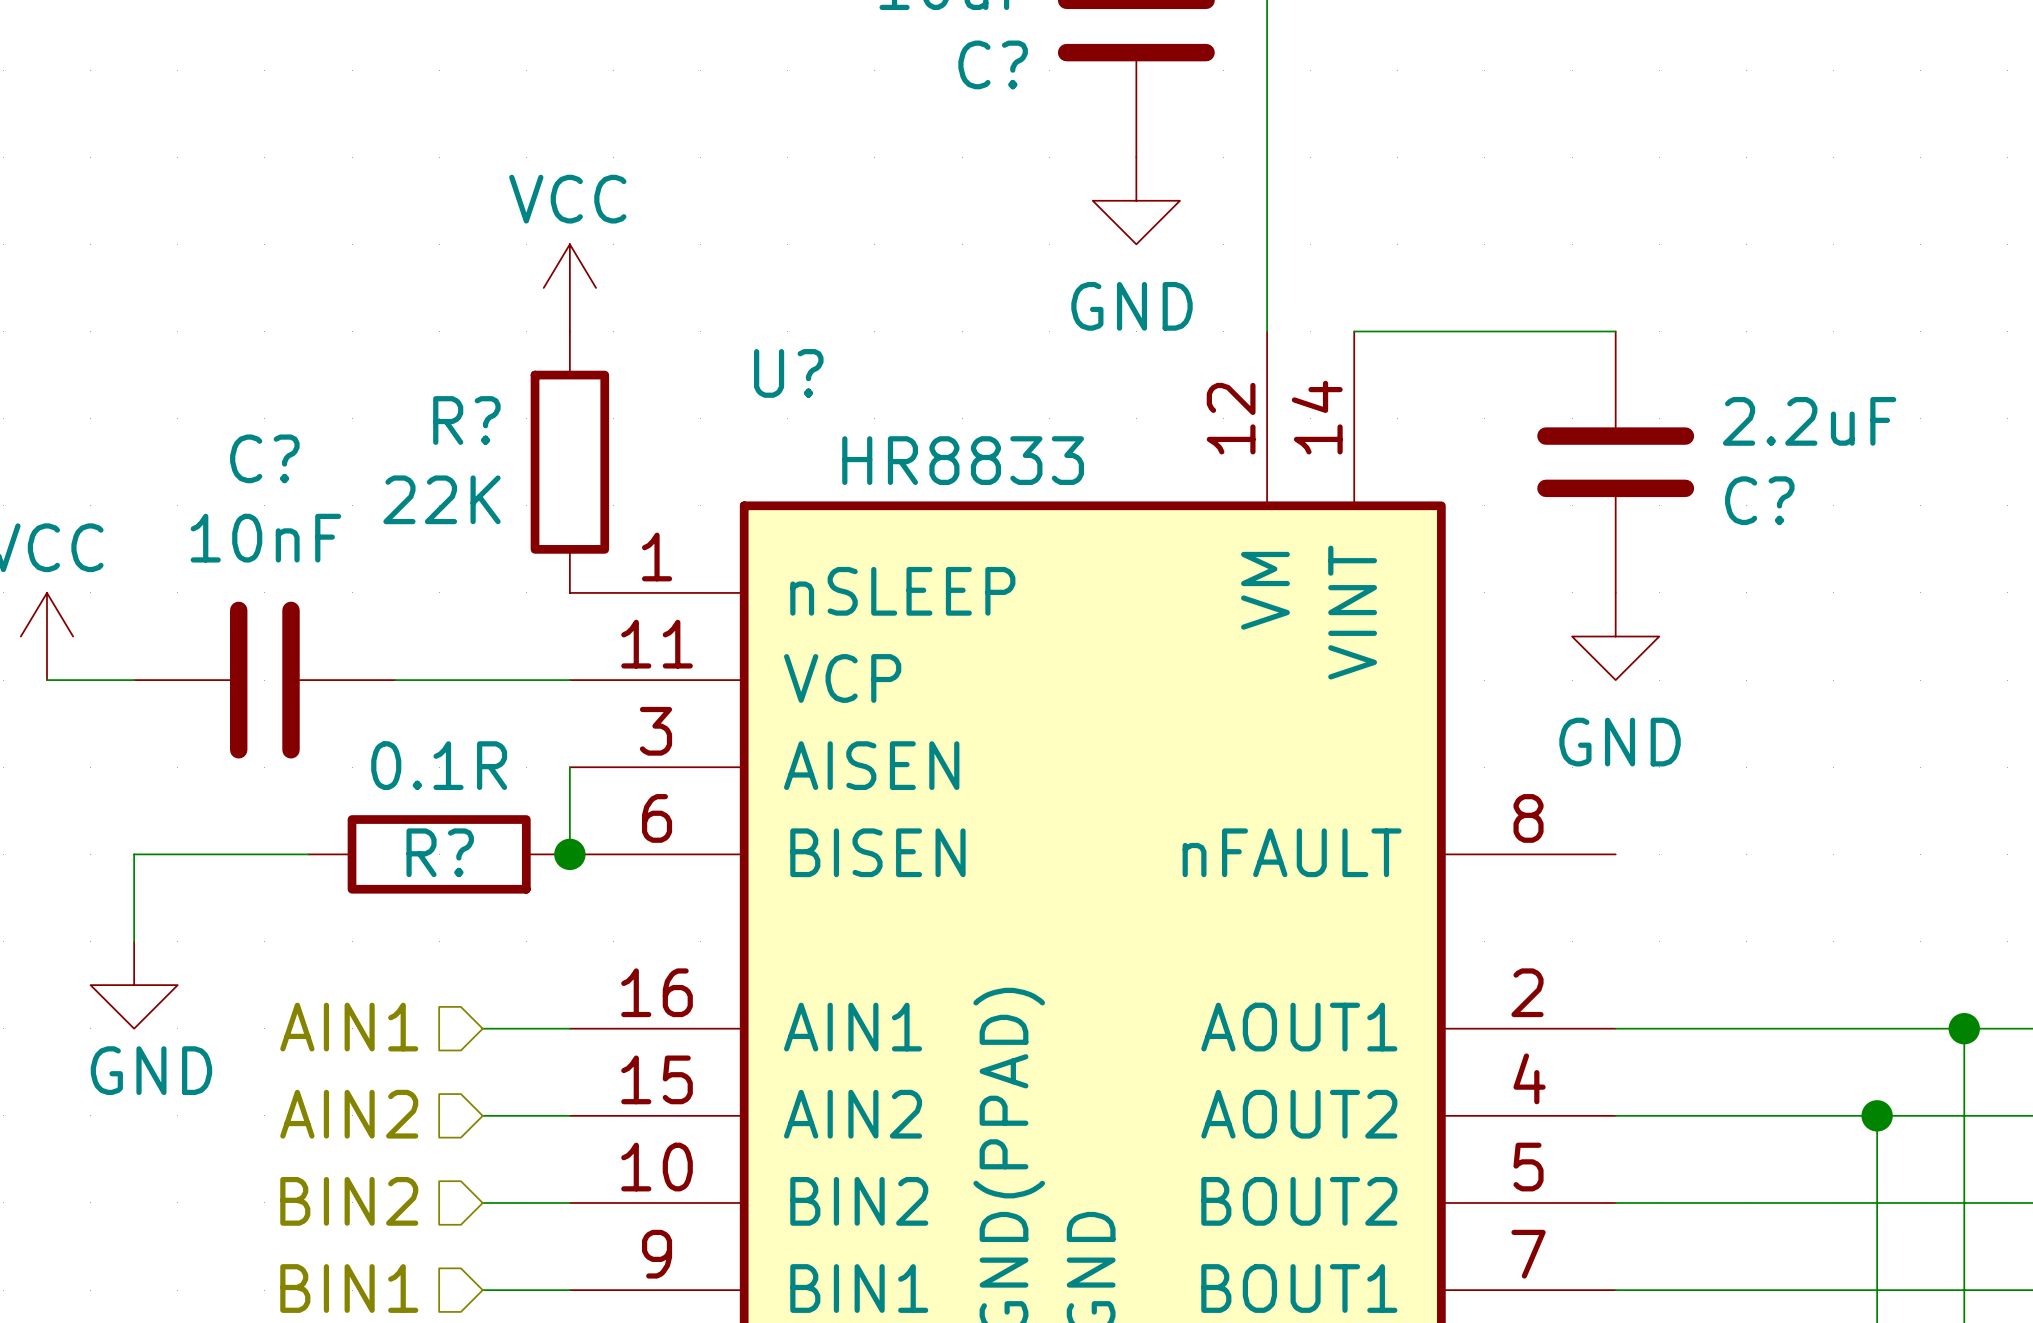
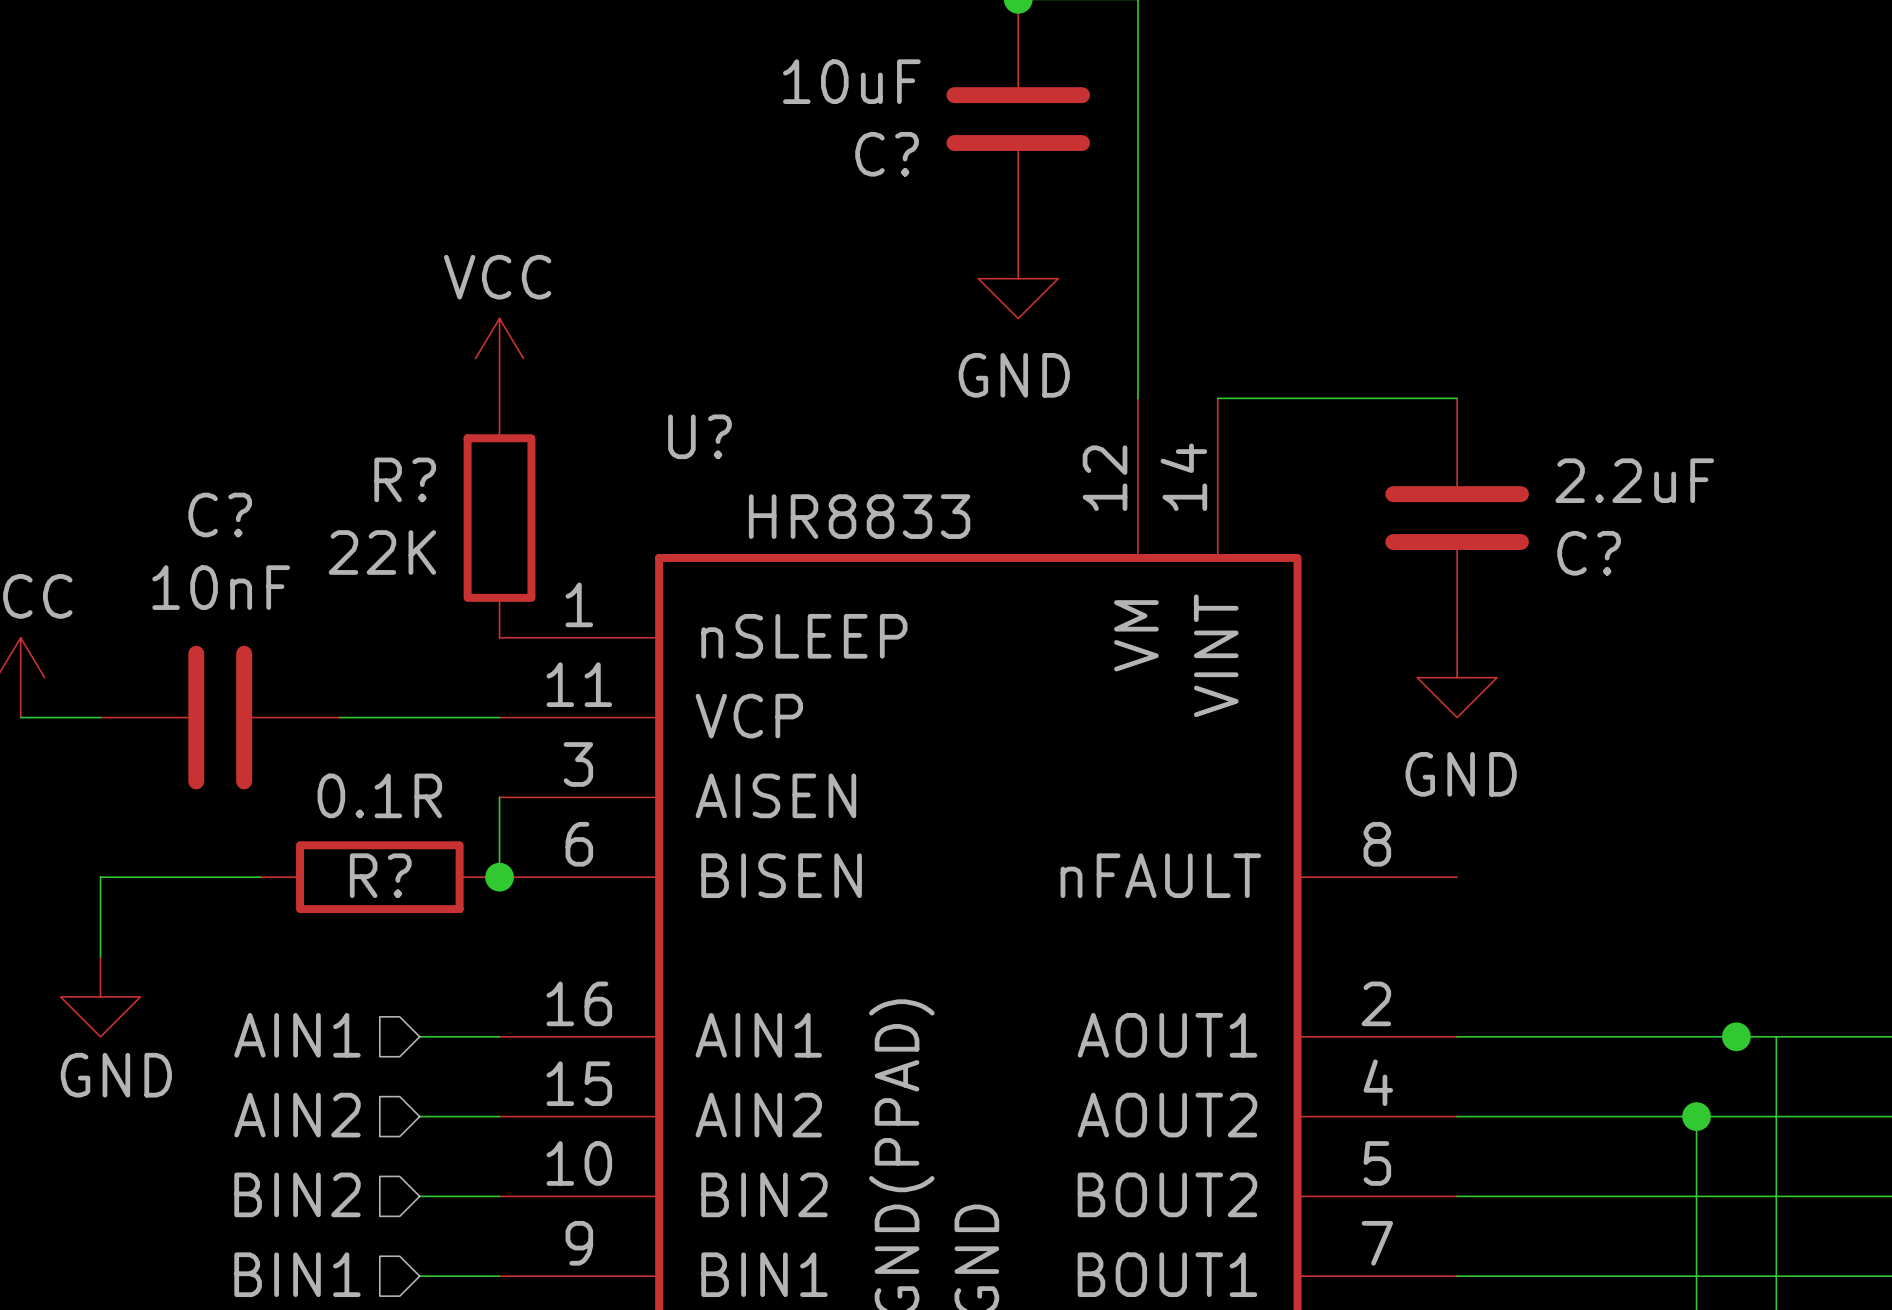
junction position: (1964, 1028) -> (1736, 1036)

